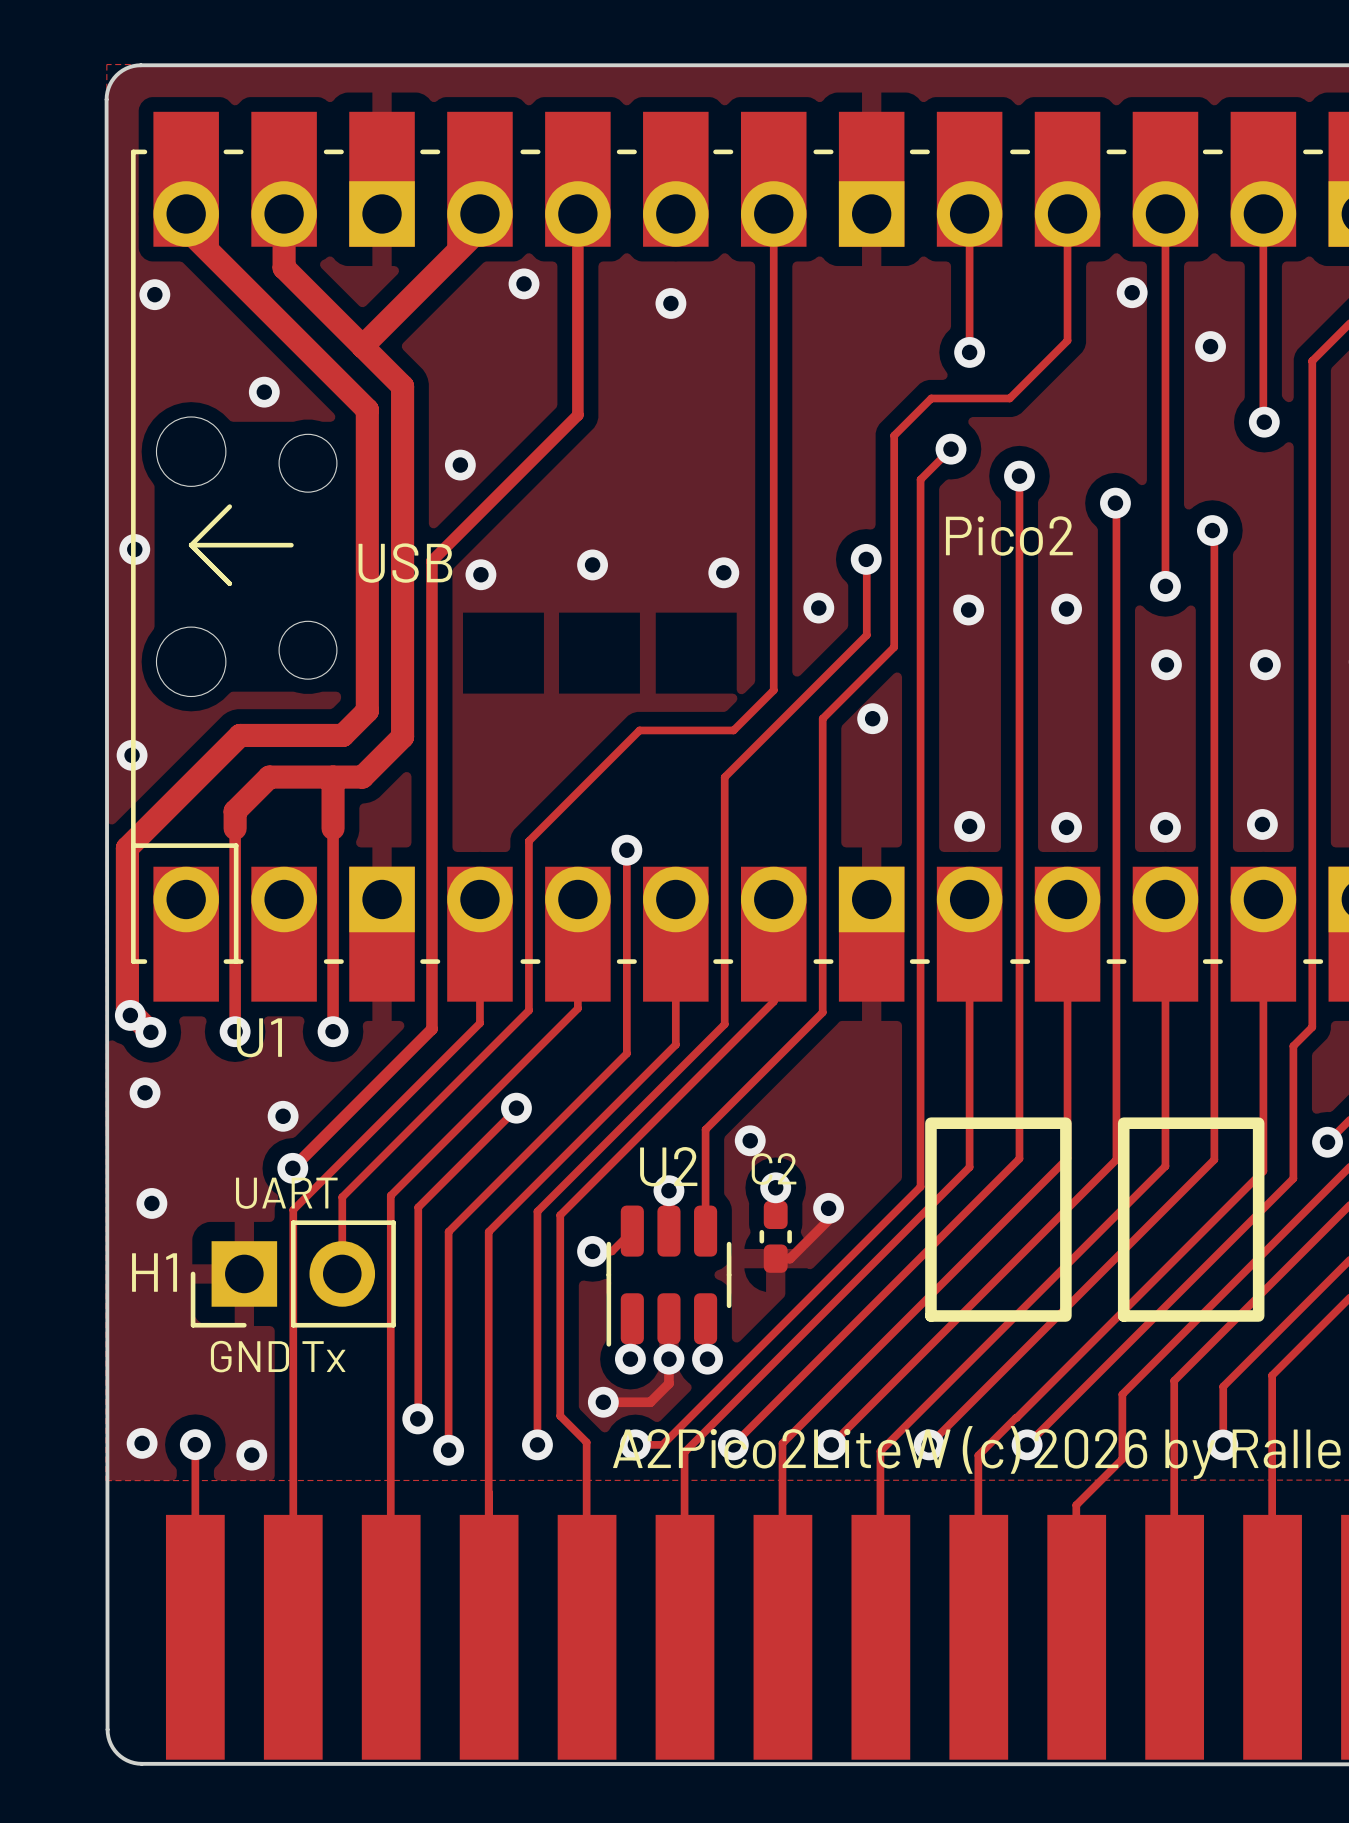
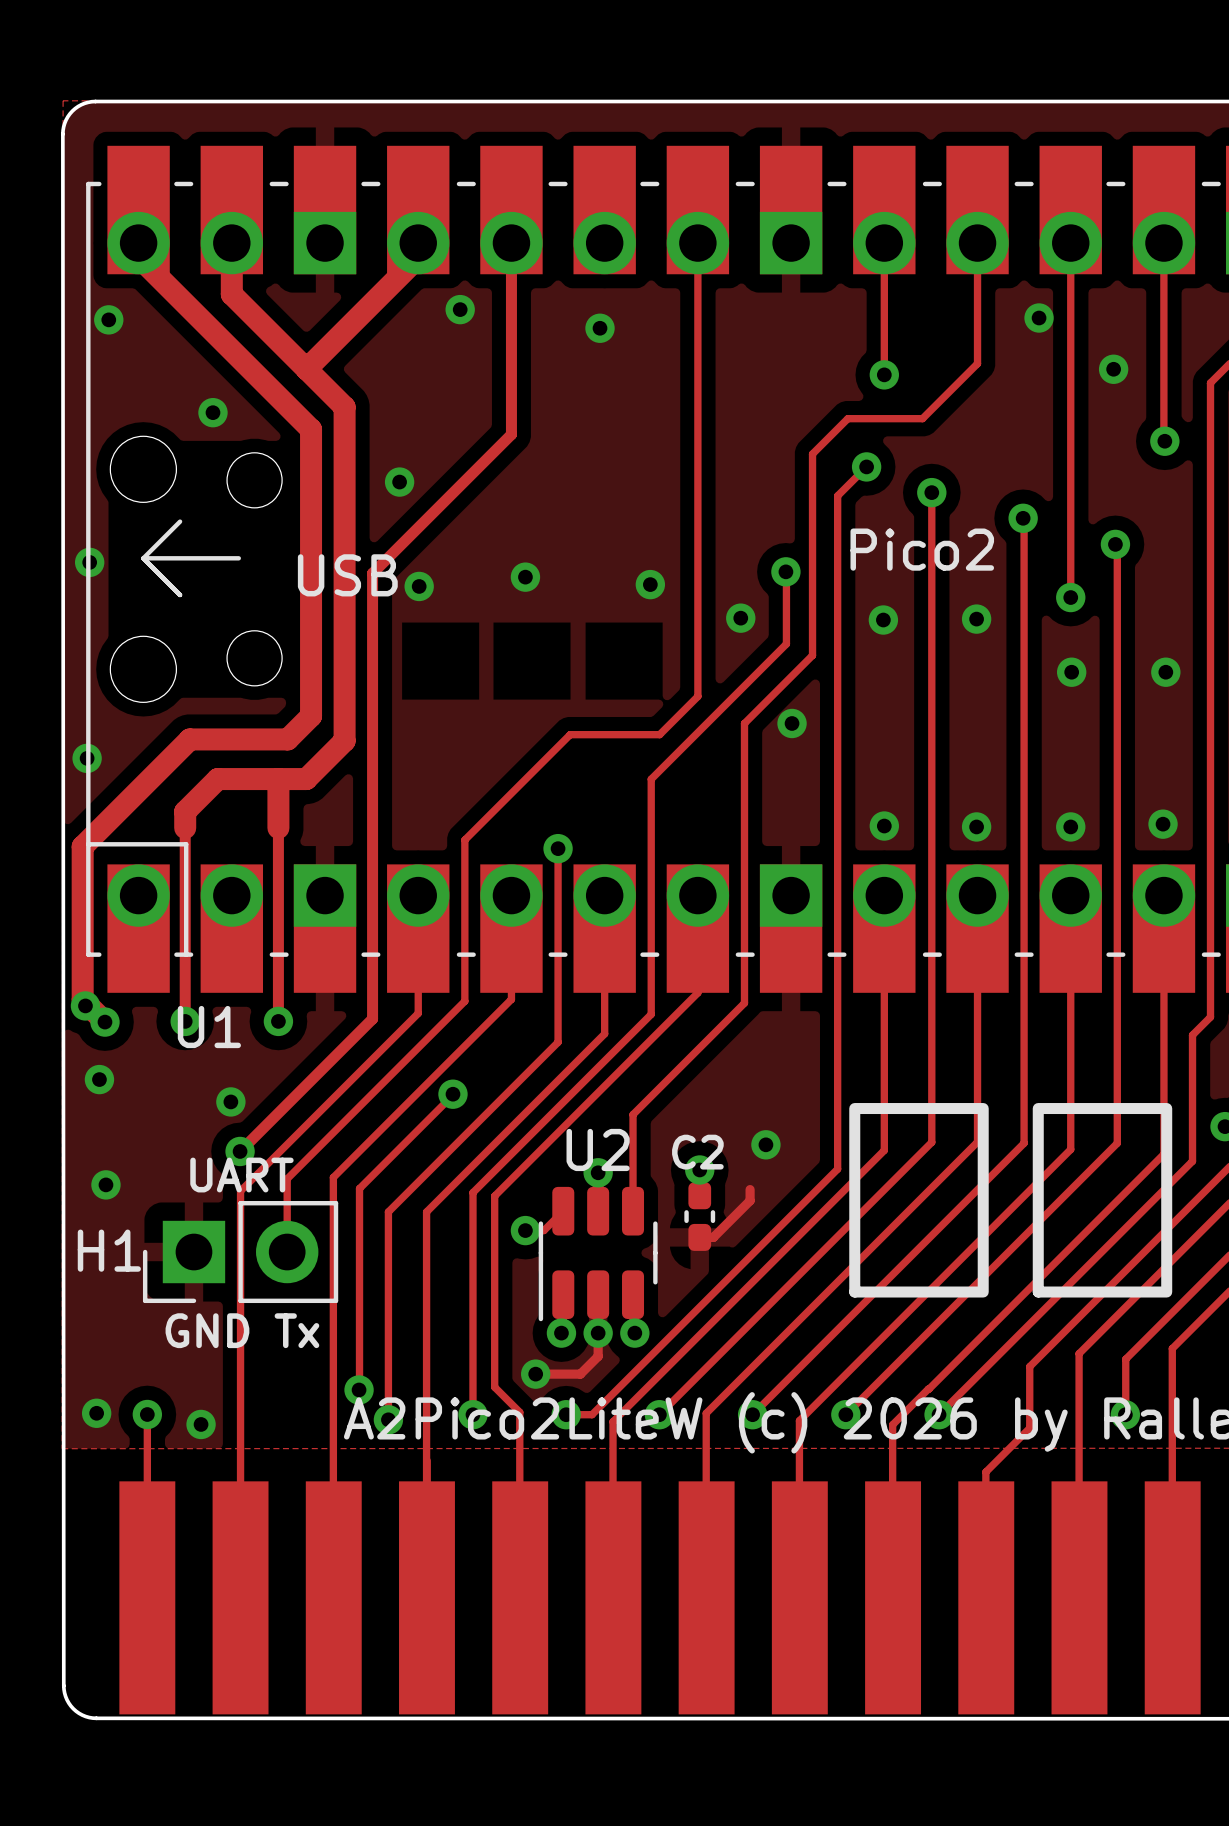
via: (750, 1140) -> none
via: none -> (765, 1144)
via: (828, 1208) -> none

